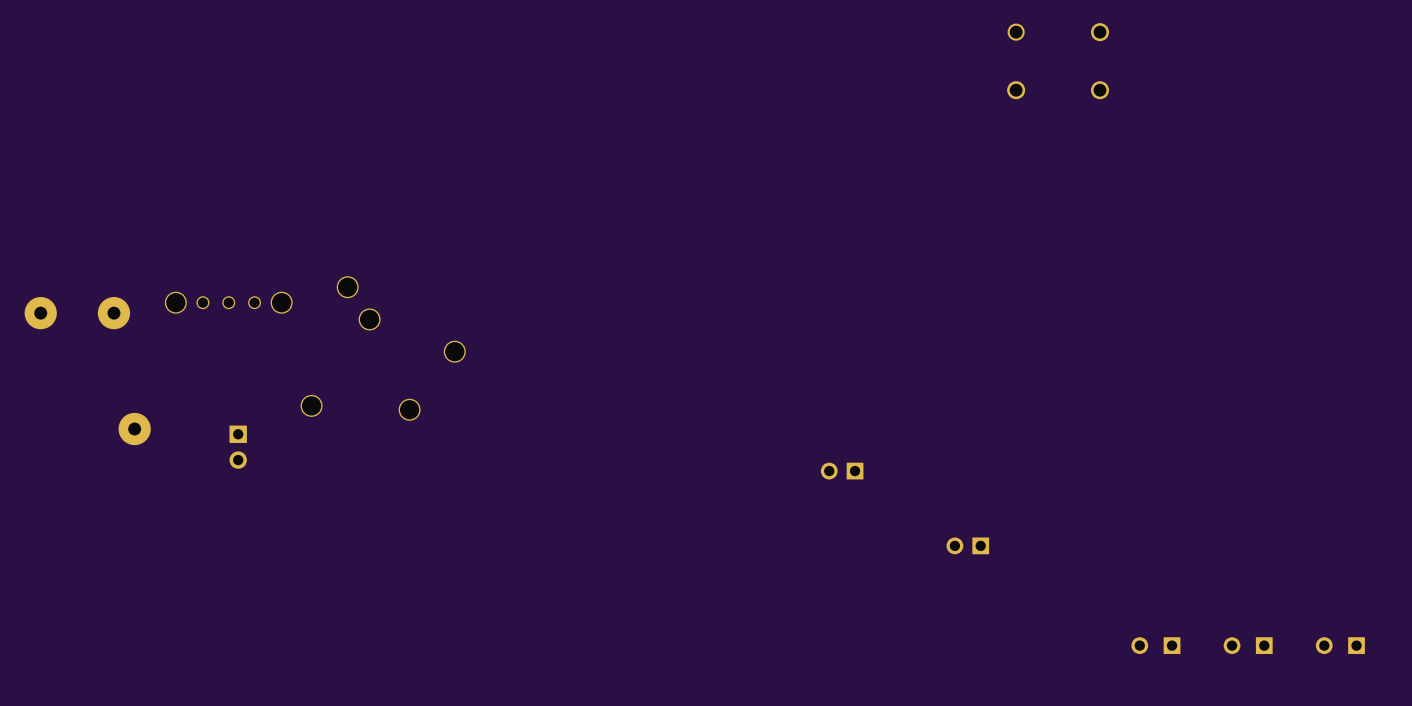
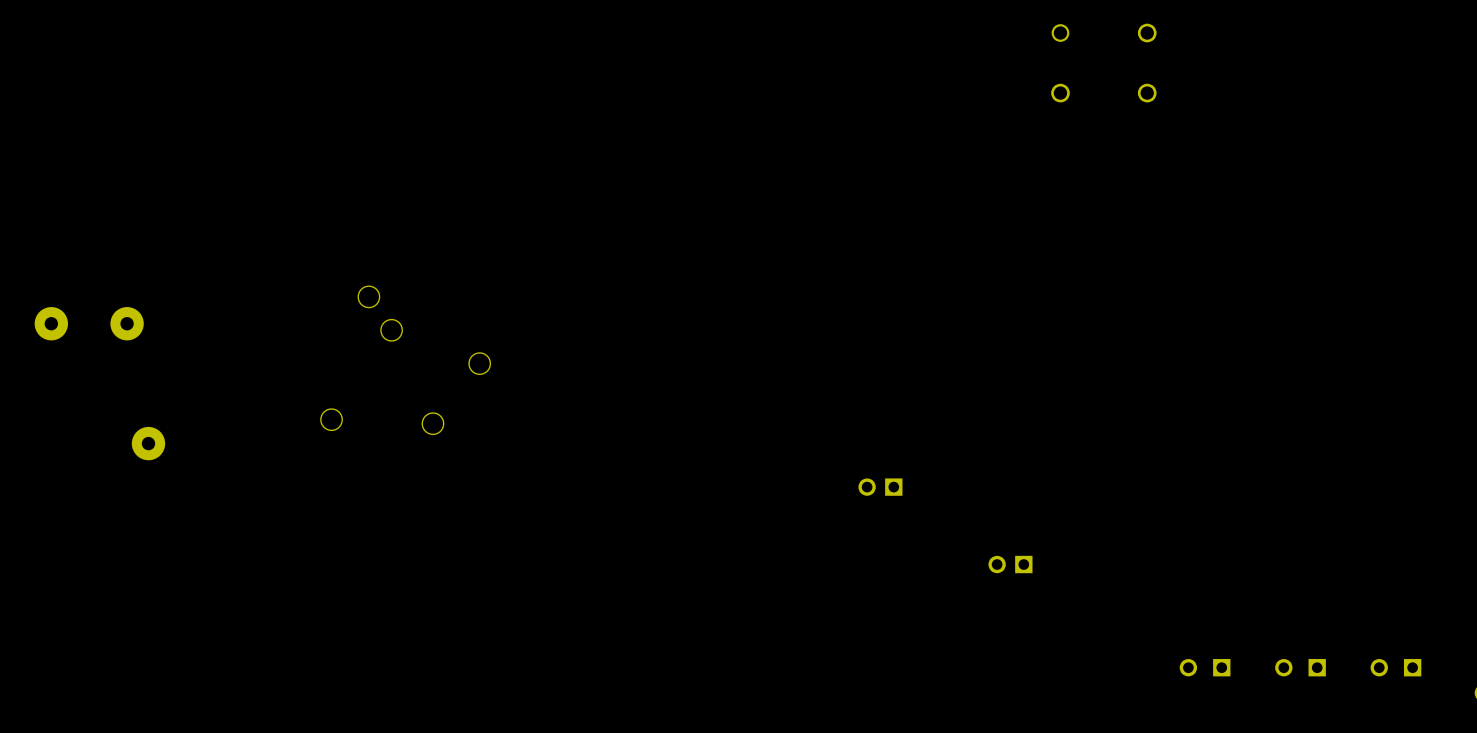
part: (228, 302) -> none
part: (238, 447) -> none

